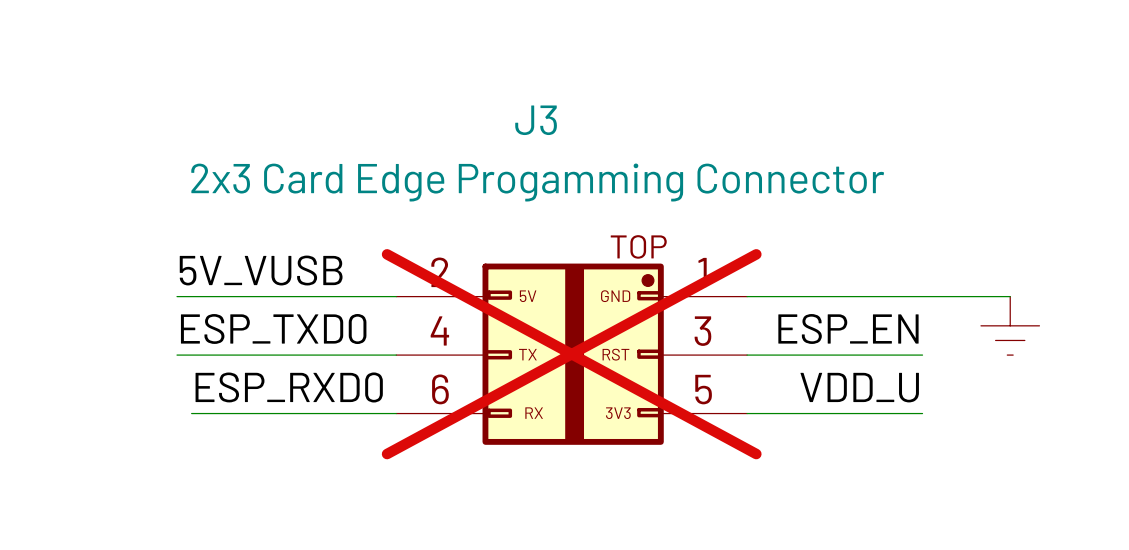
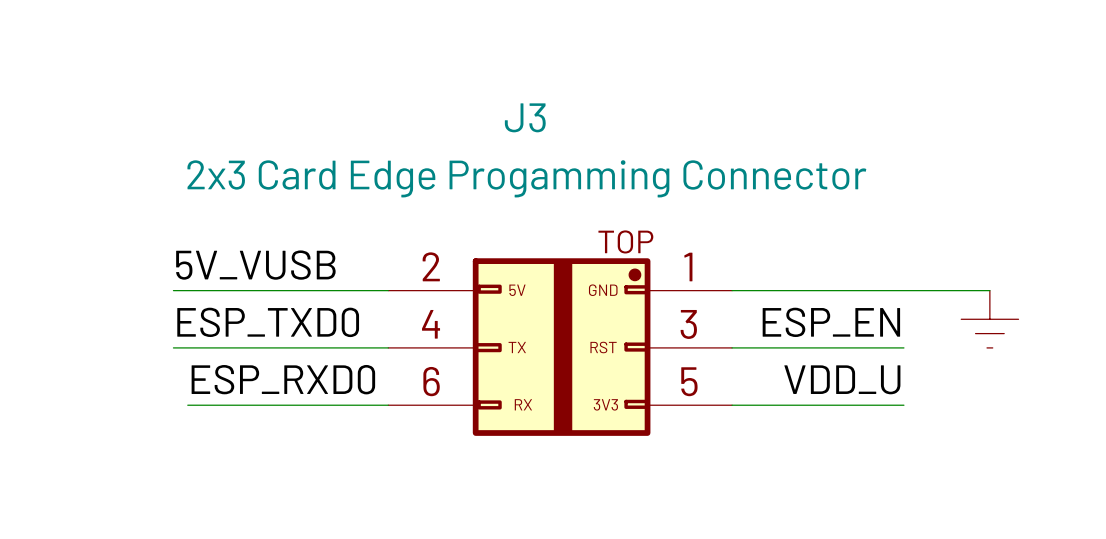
J3 do-not-place cross: (571, 354) -> none

